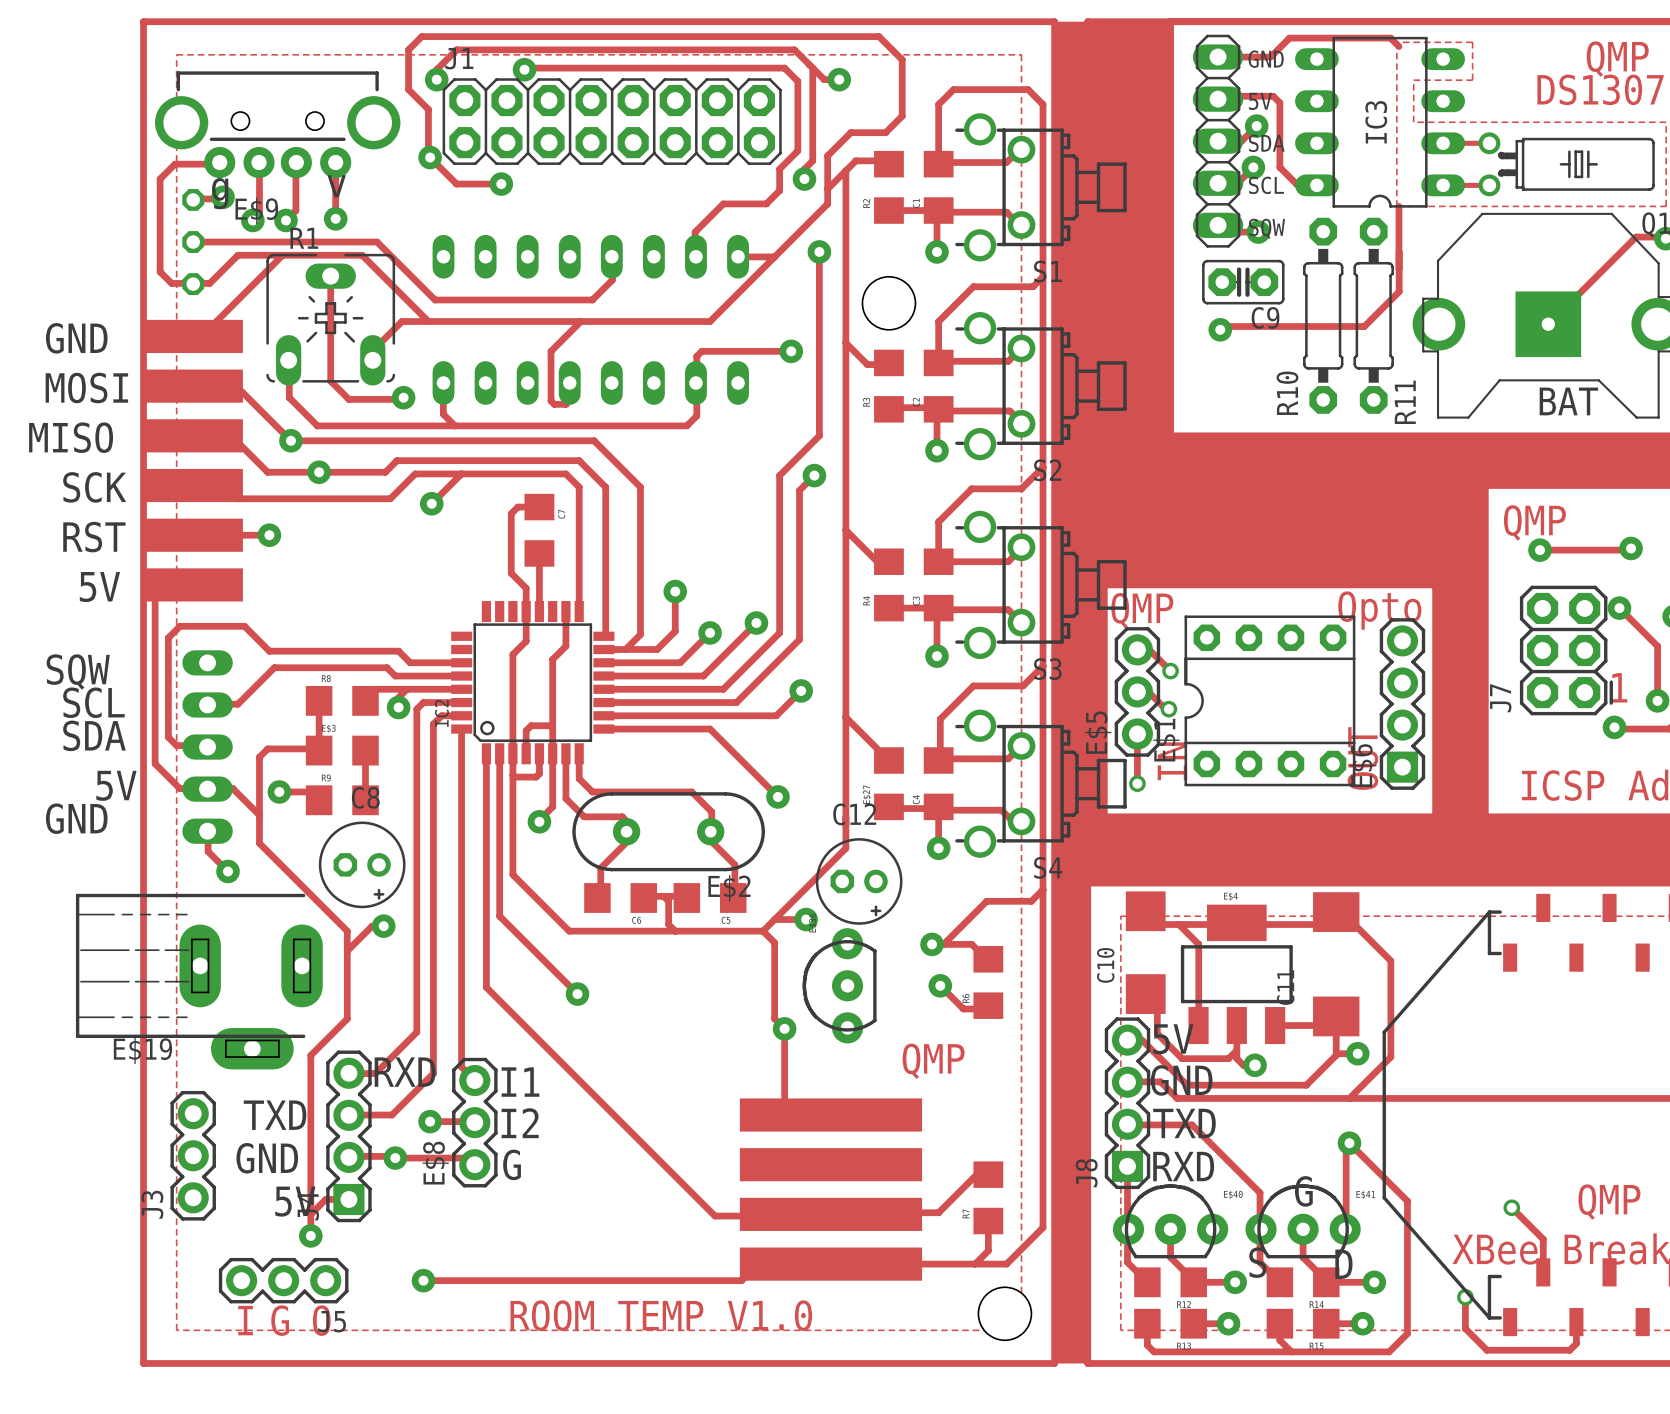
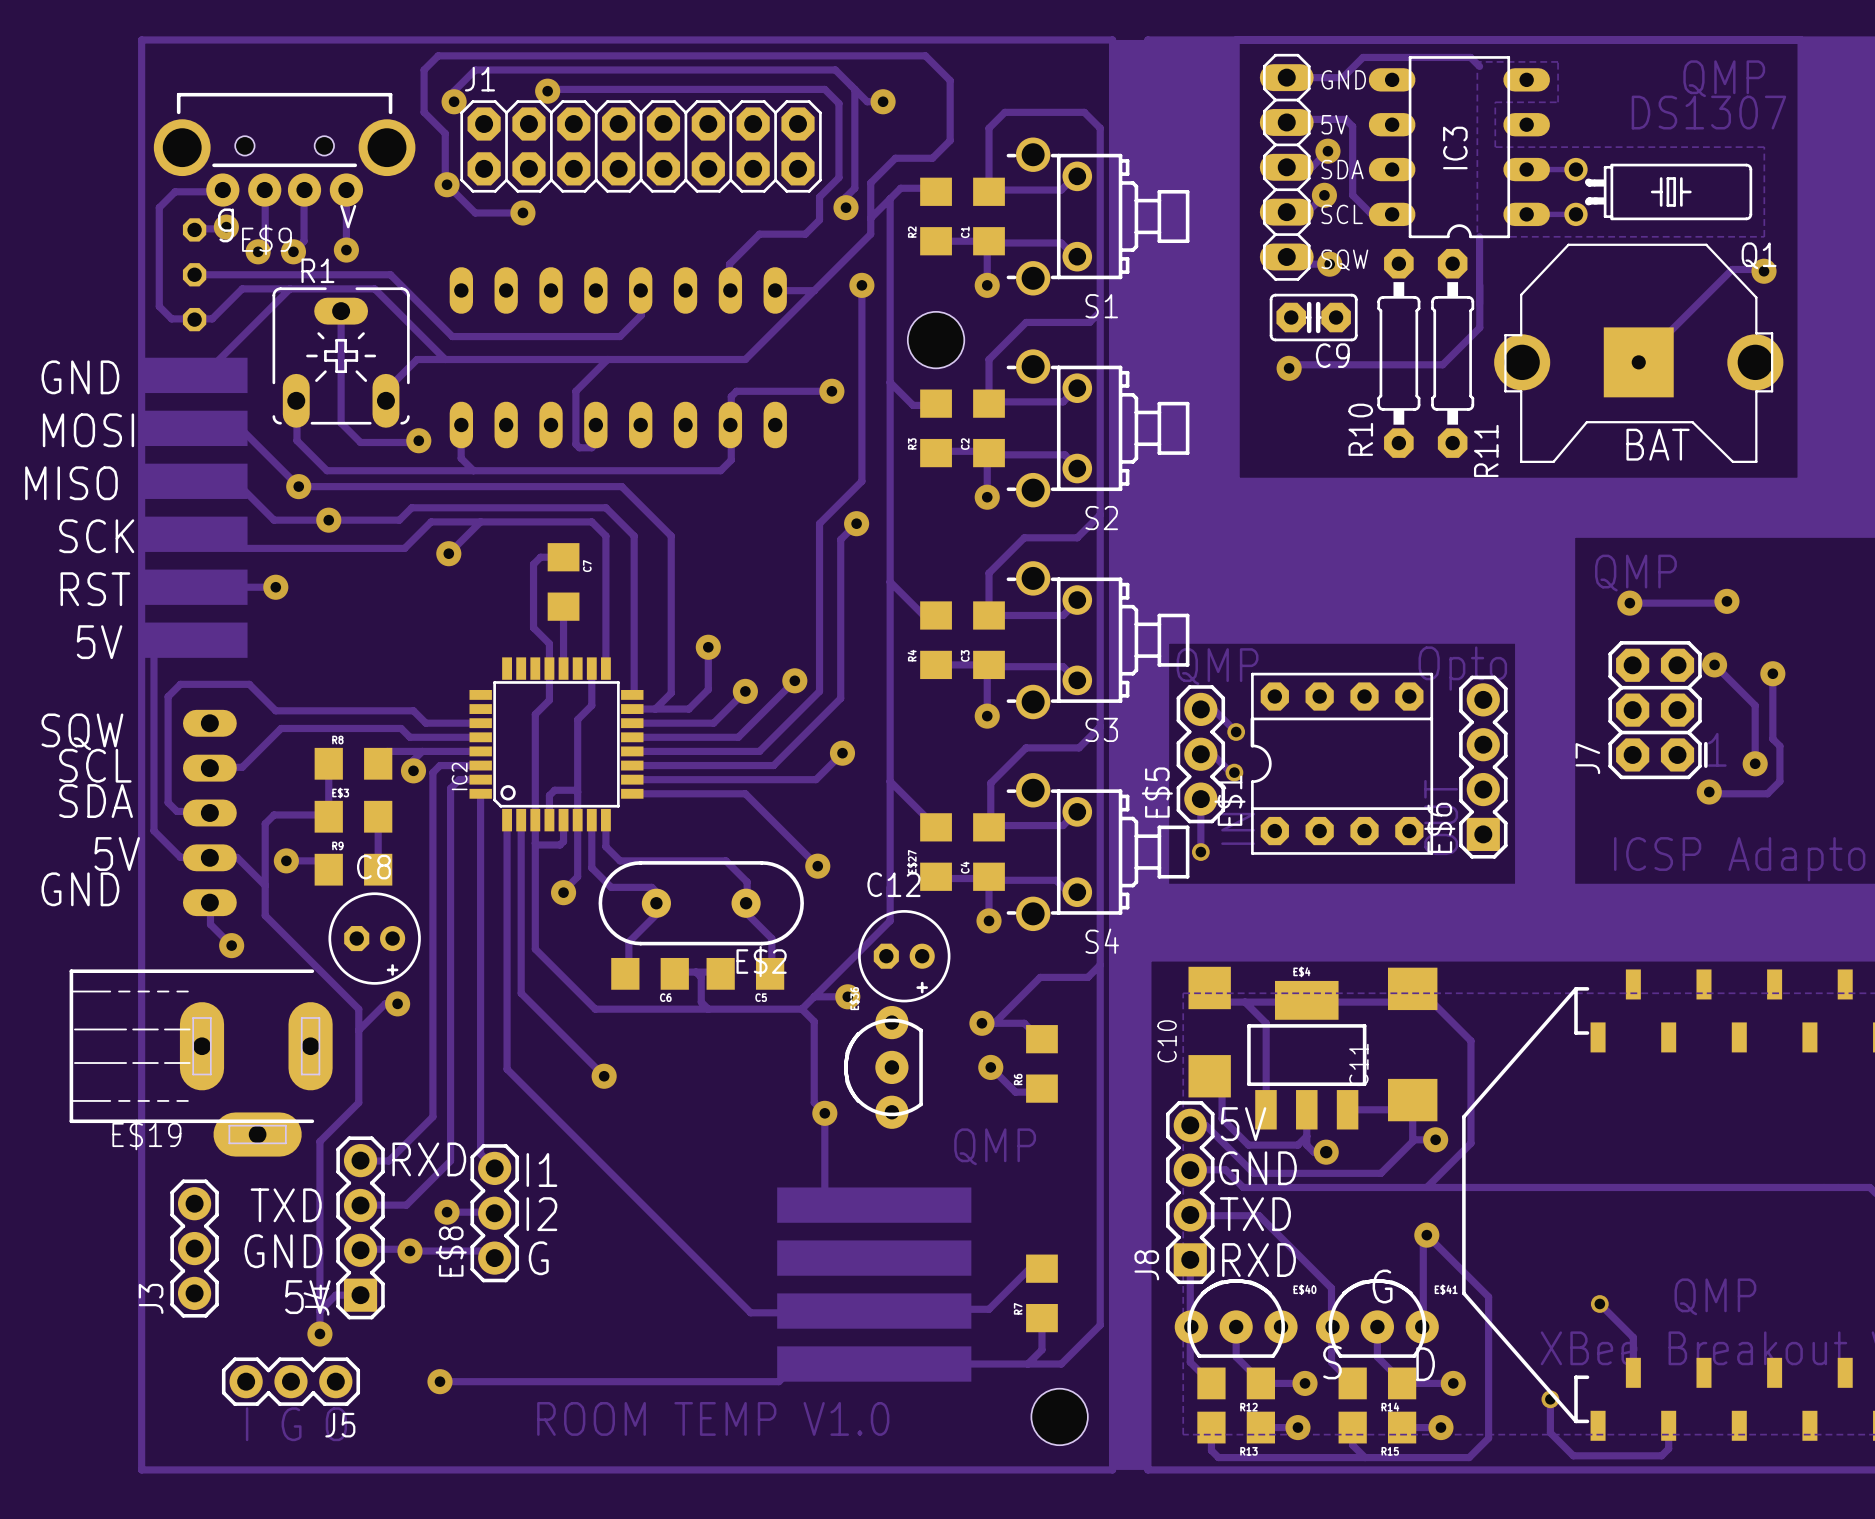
zone outline: (176, 54) (1021, 54) (1021, 1330) (176, 1330) (176, 54) -> none

